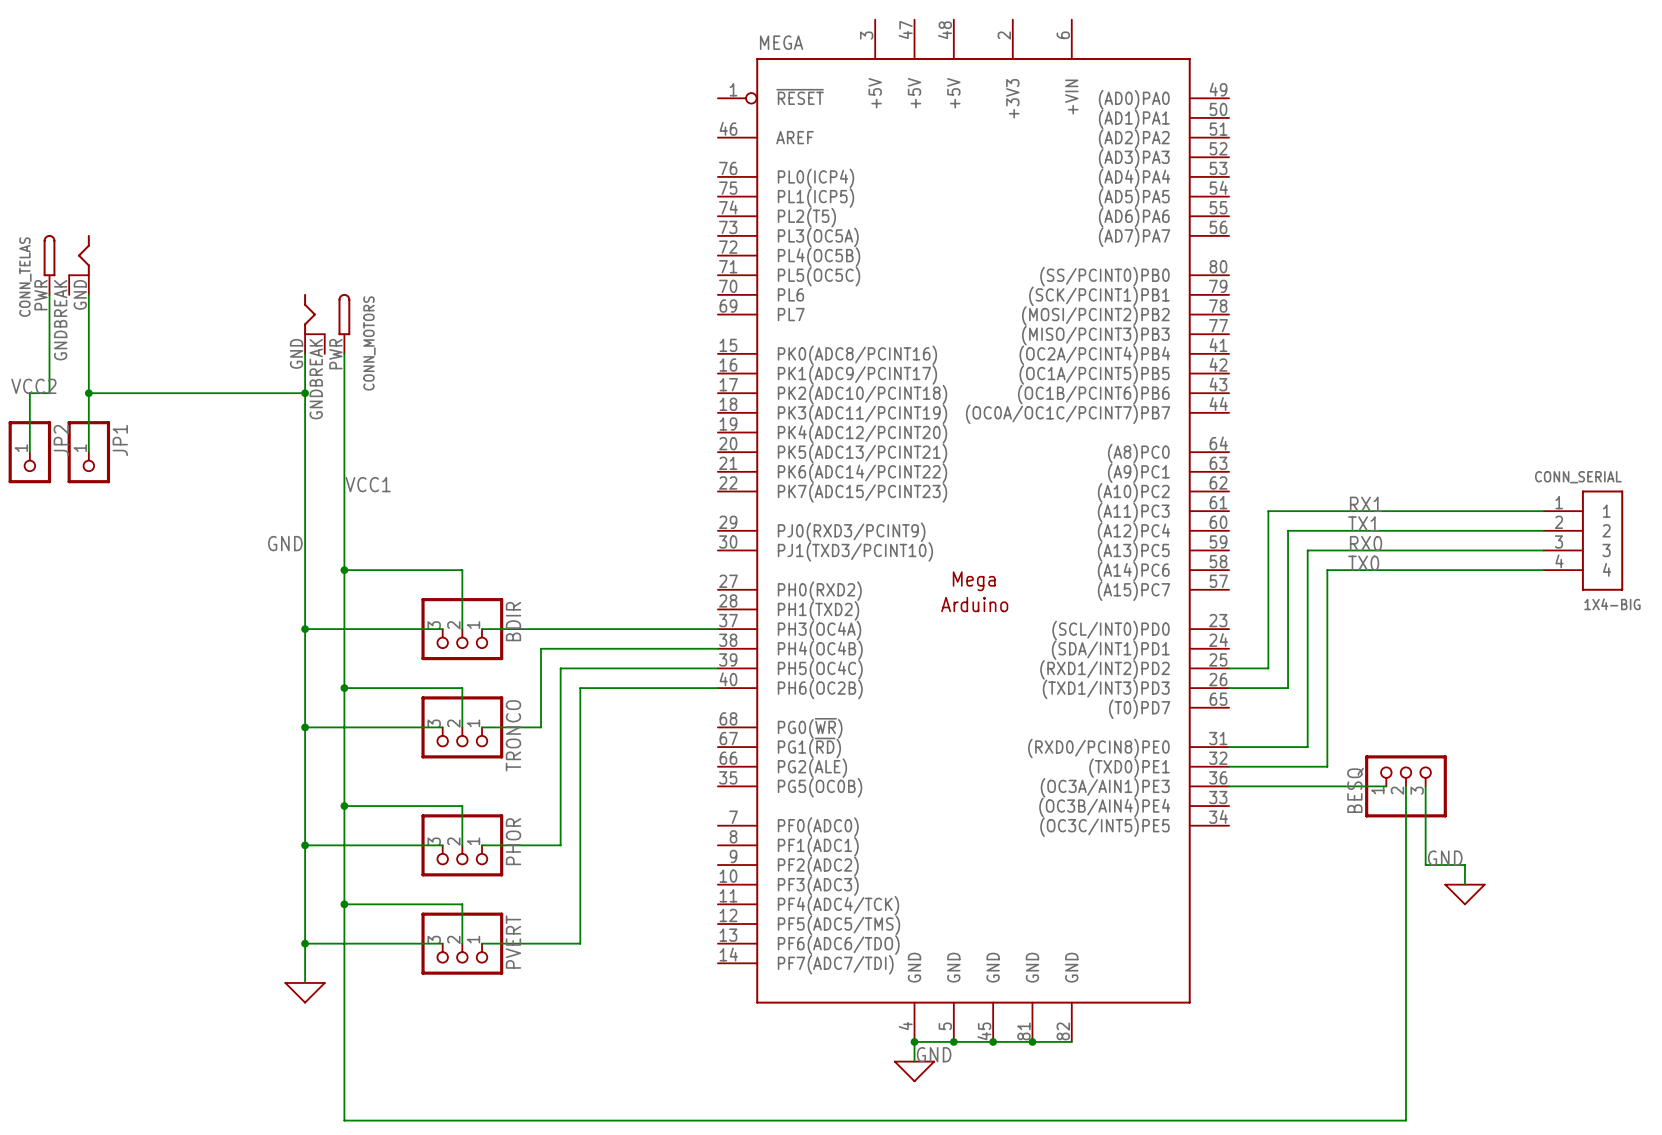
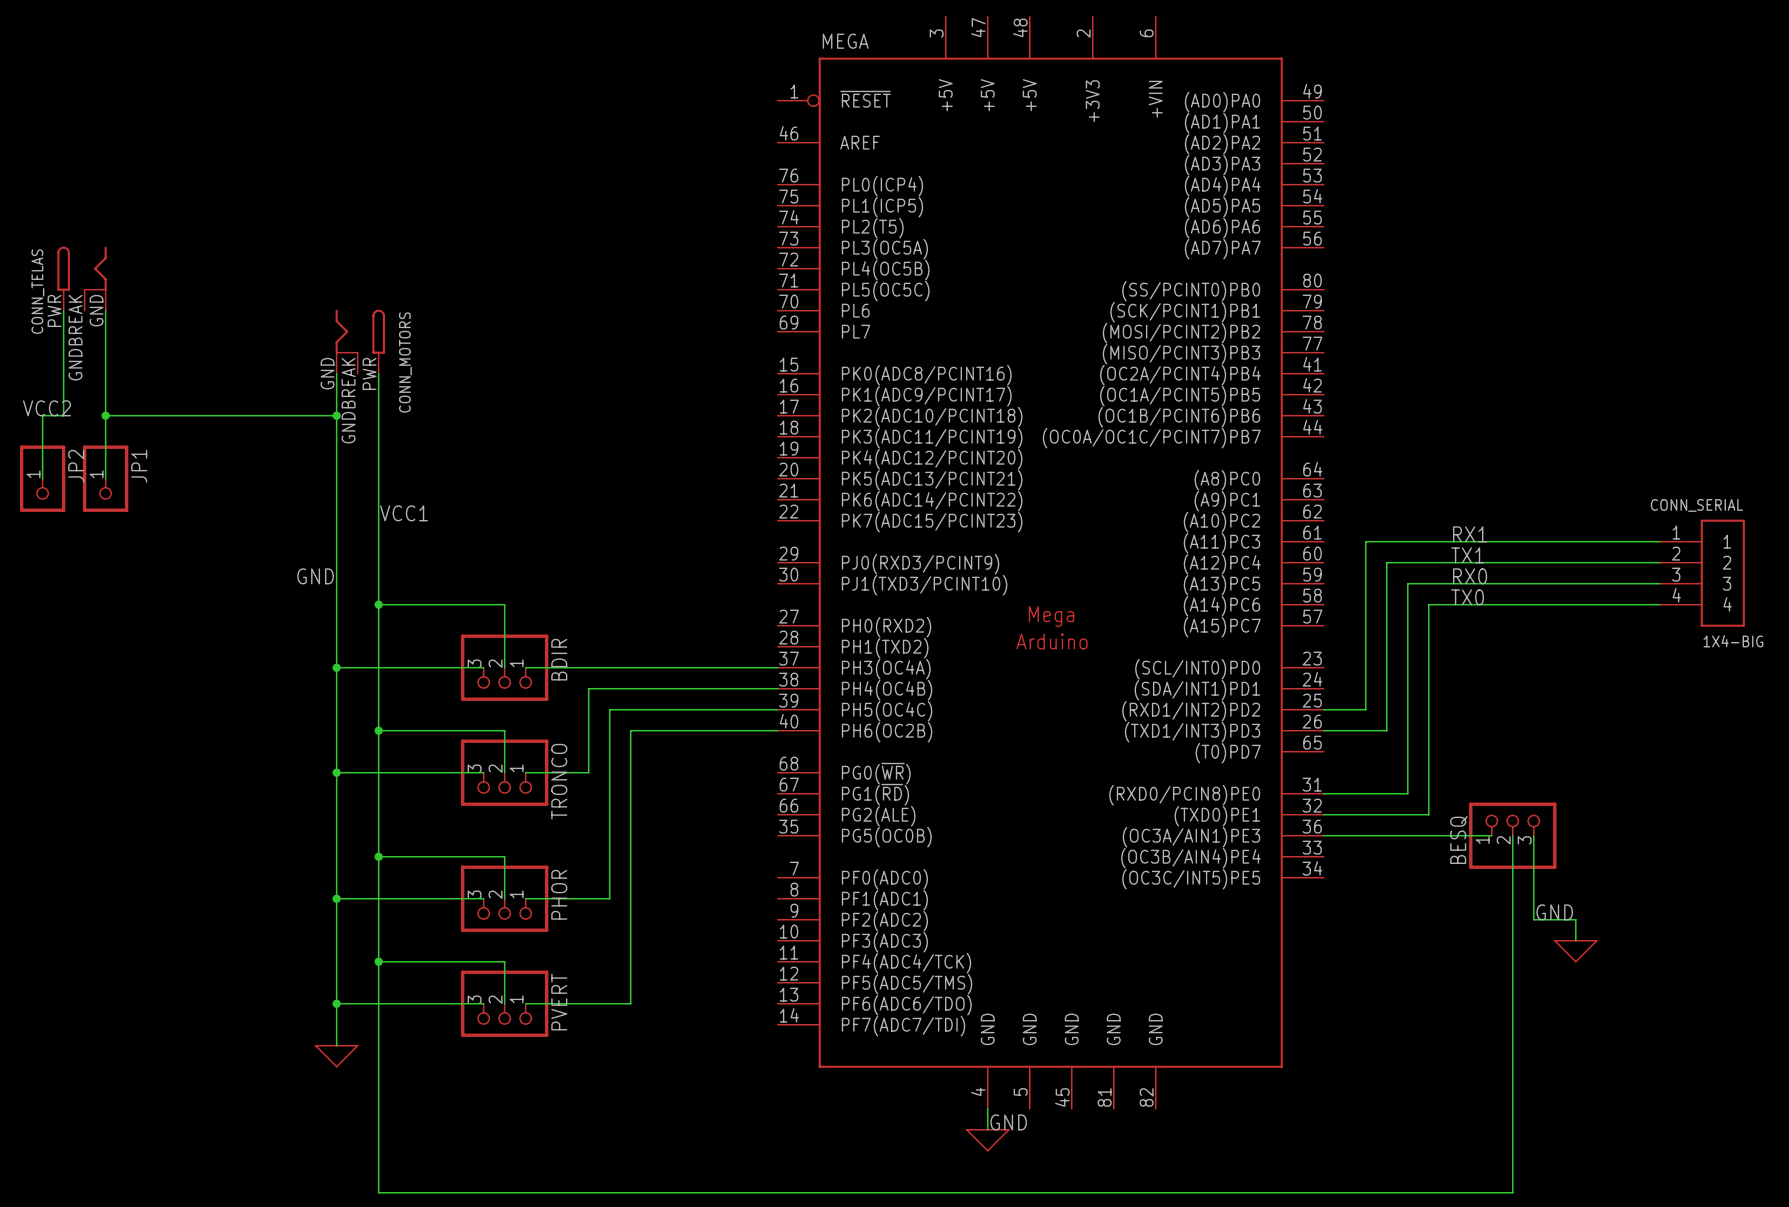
wire: (914, 1041) (1071, 1041) -> none
junction: (914, 1041) -> none
junction: (953, 1041) -> none
junction: (993, 1041) -> none
junction: (1032, 1041) -> none

